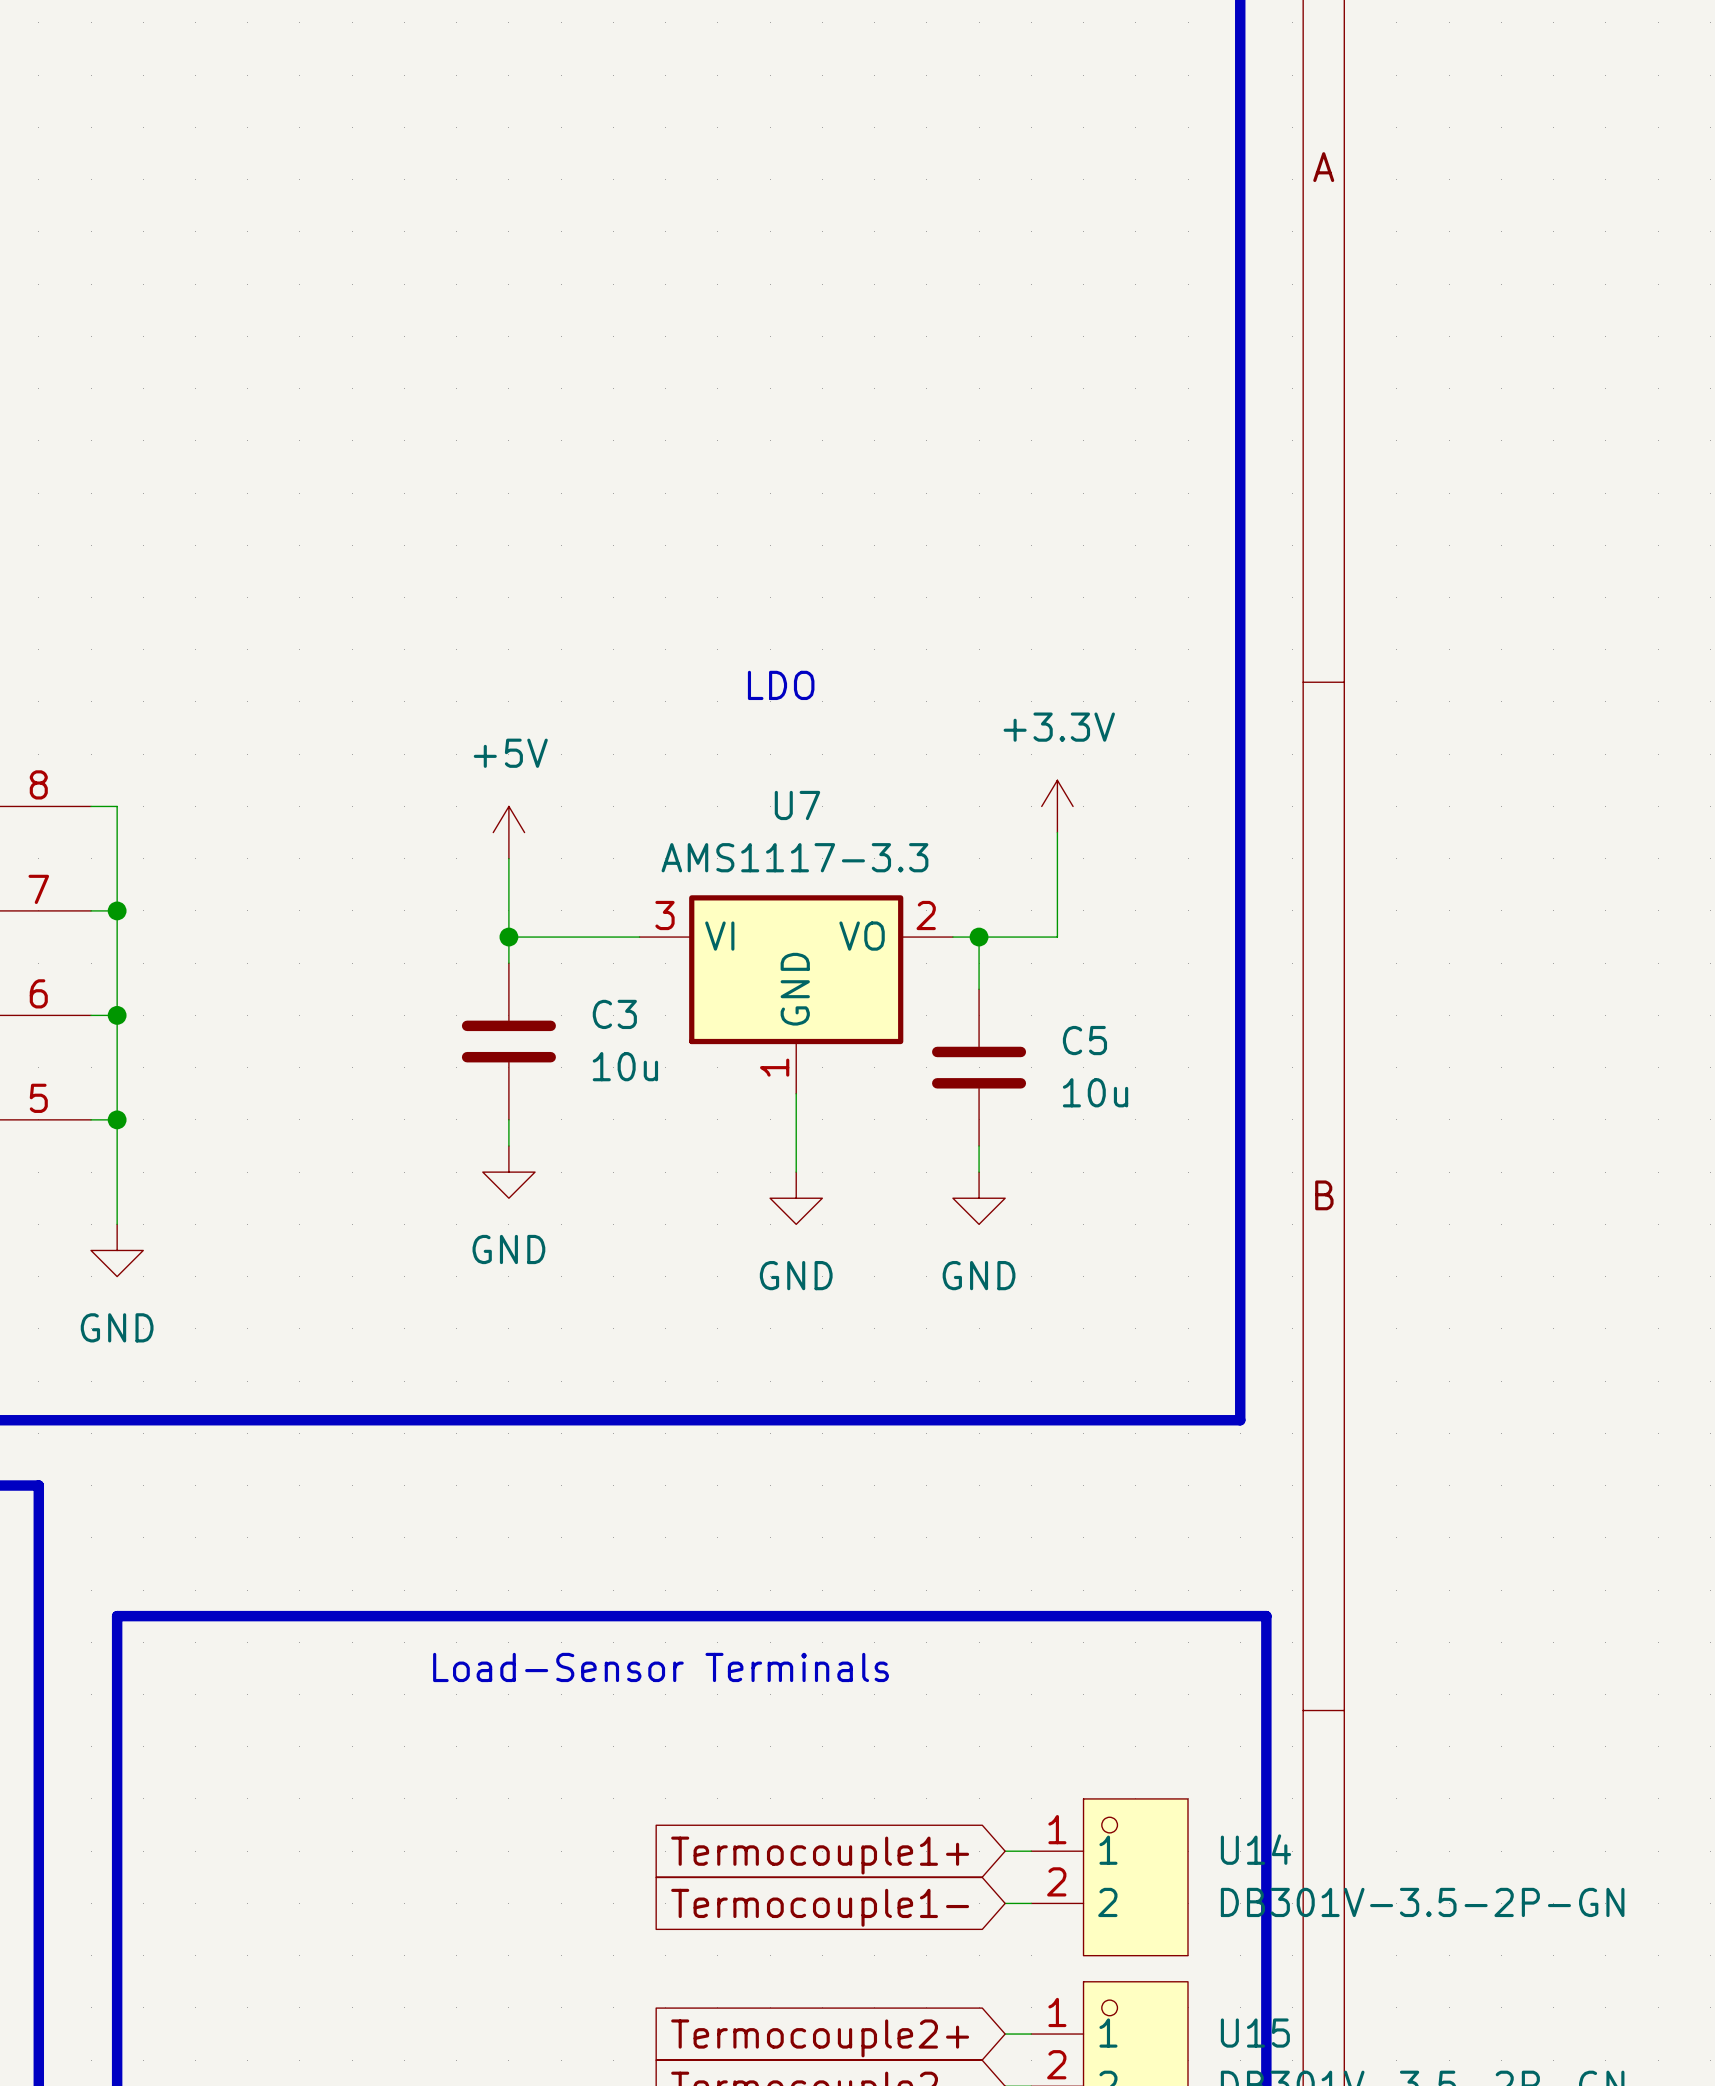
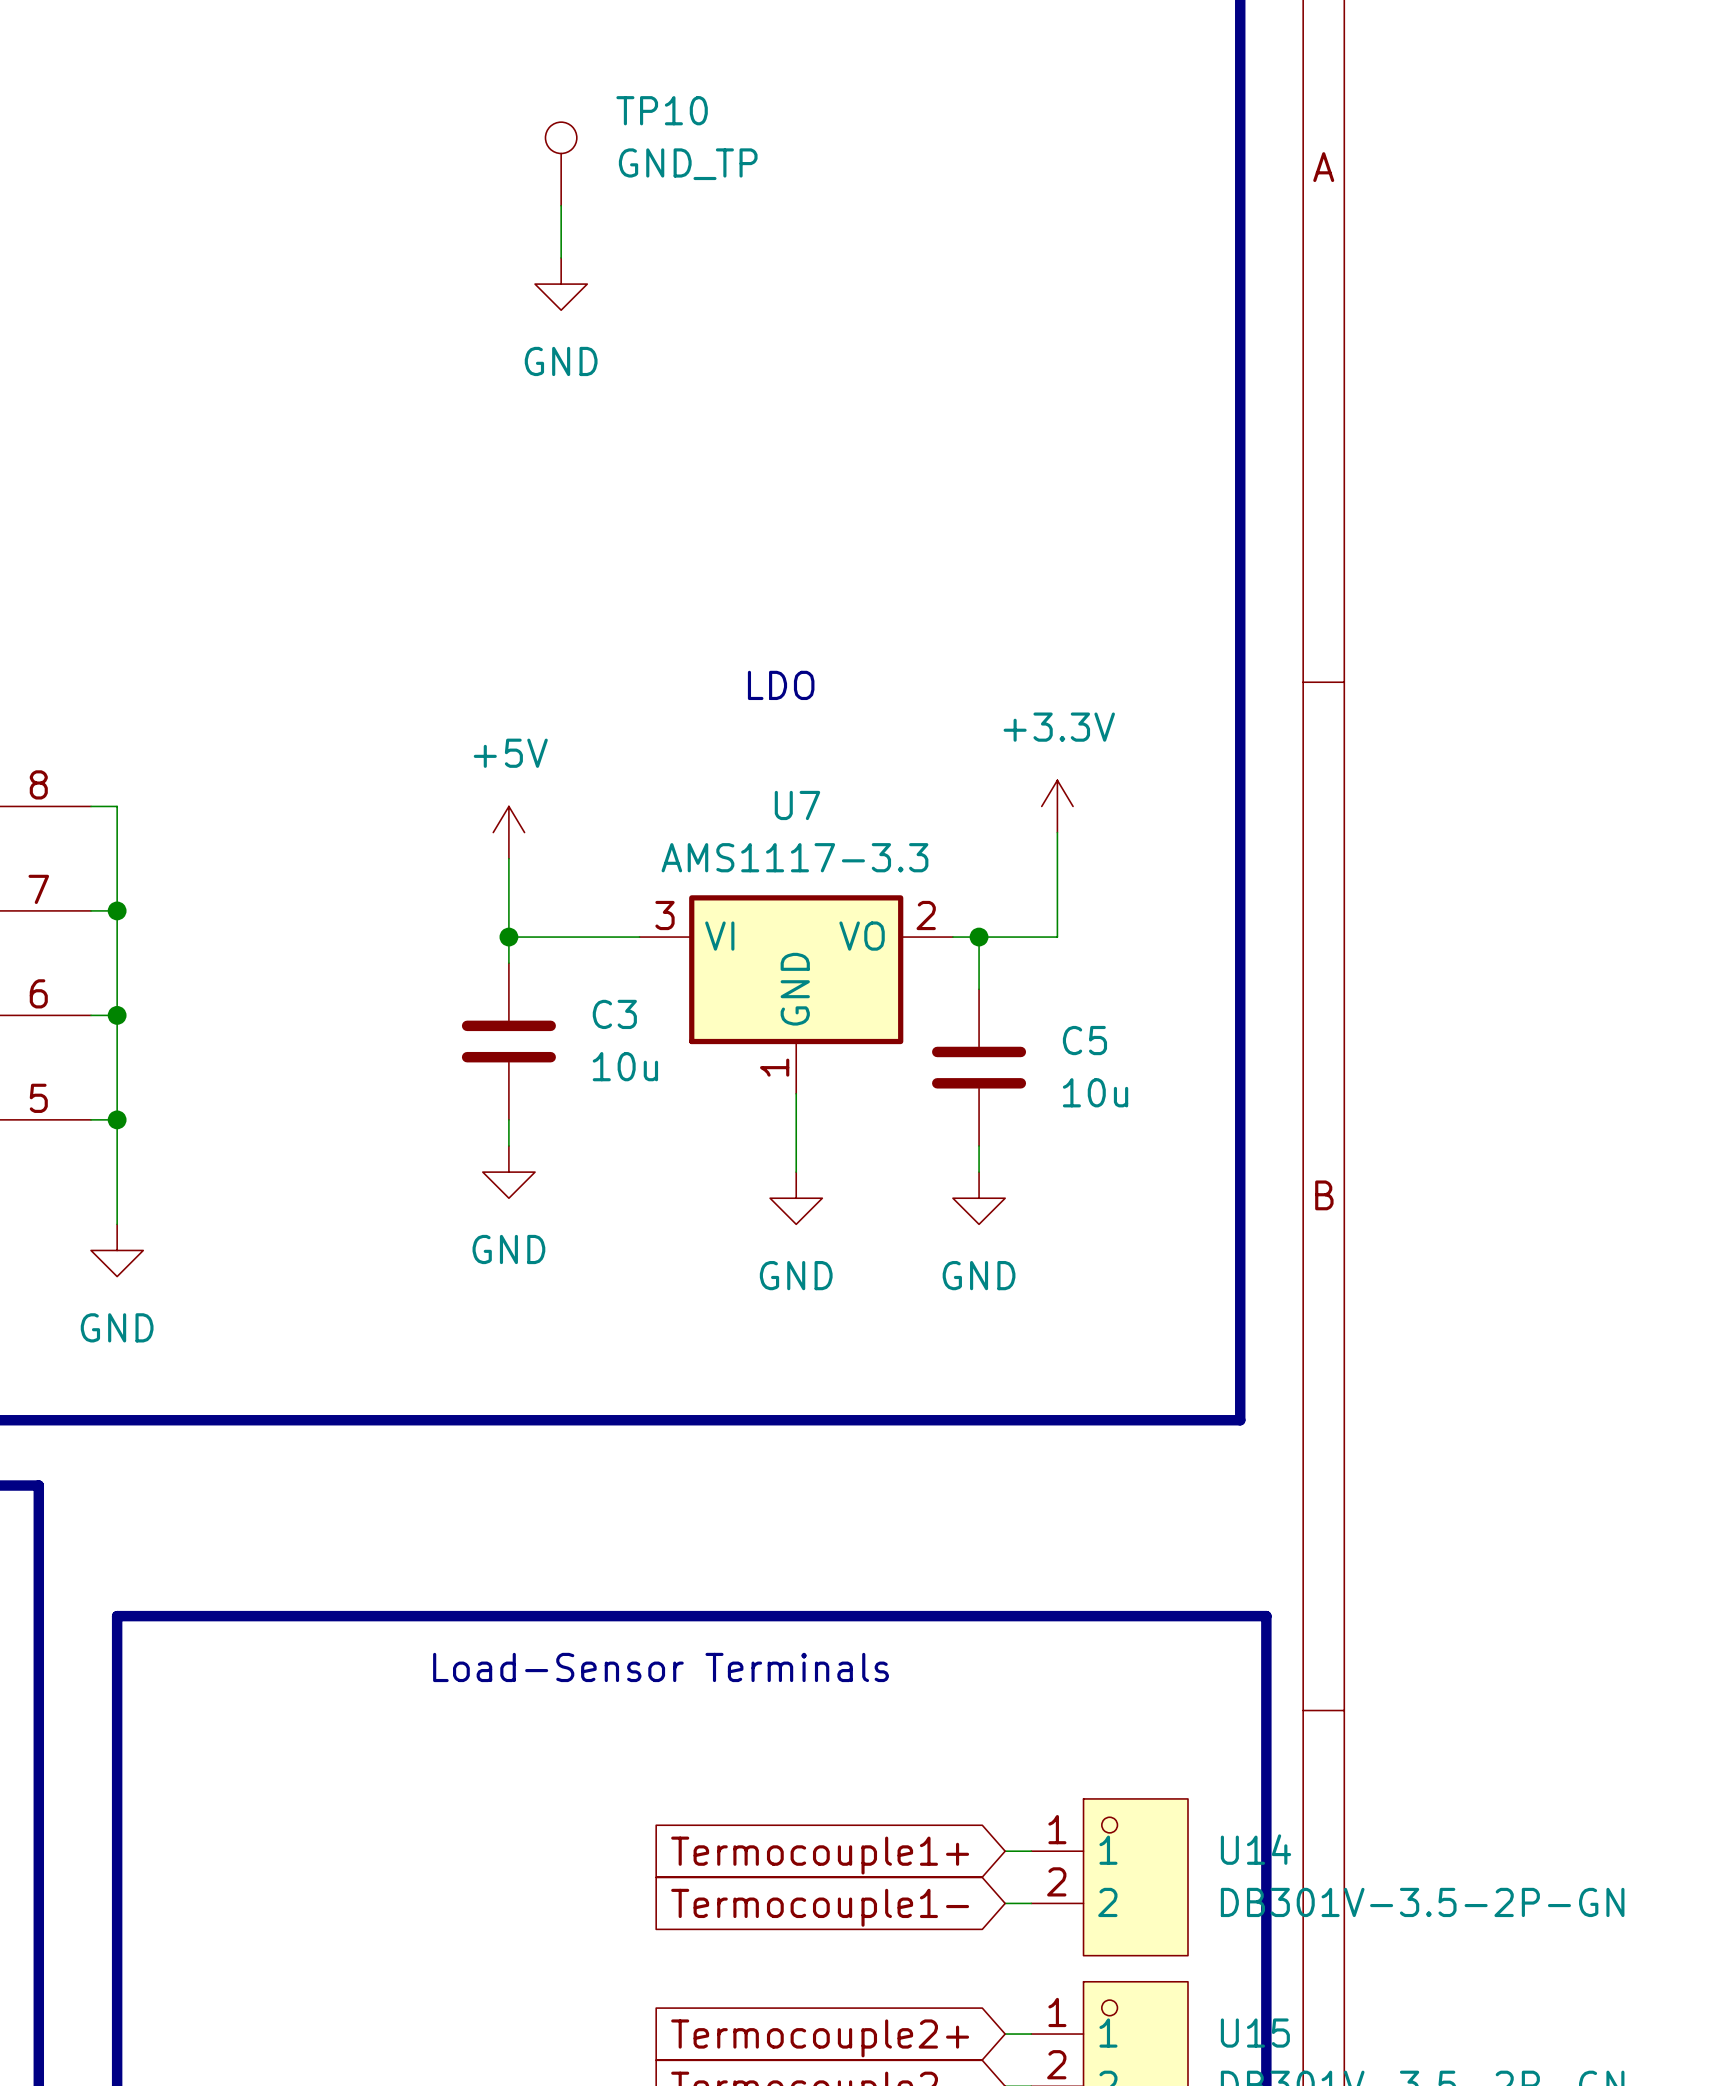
TP10: none -> GND_TP (561, 163)
wire: none -> (561, 205) (561, 257)
power symbol: none -> GND (561, 284)

